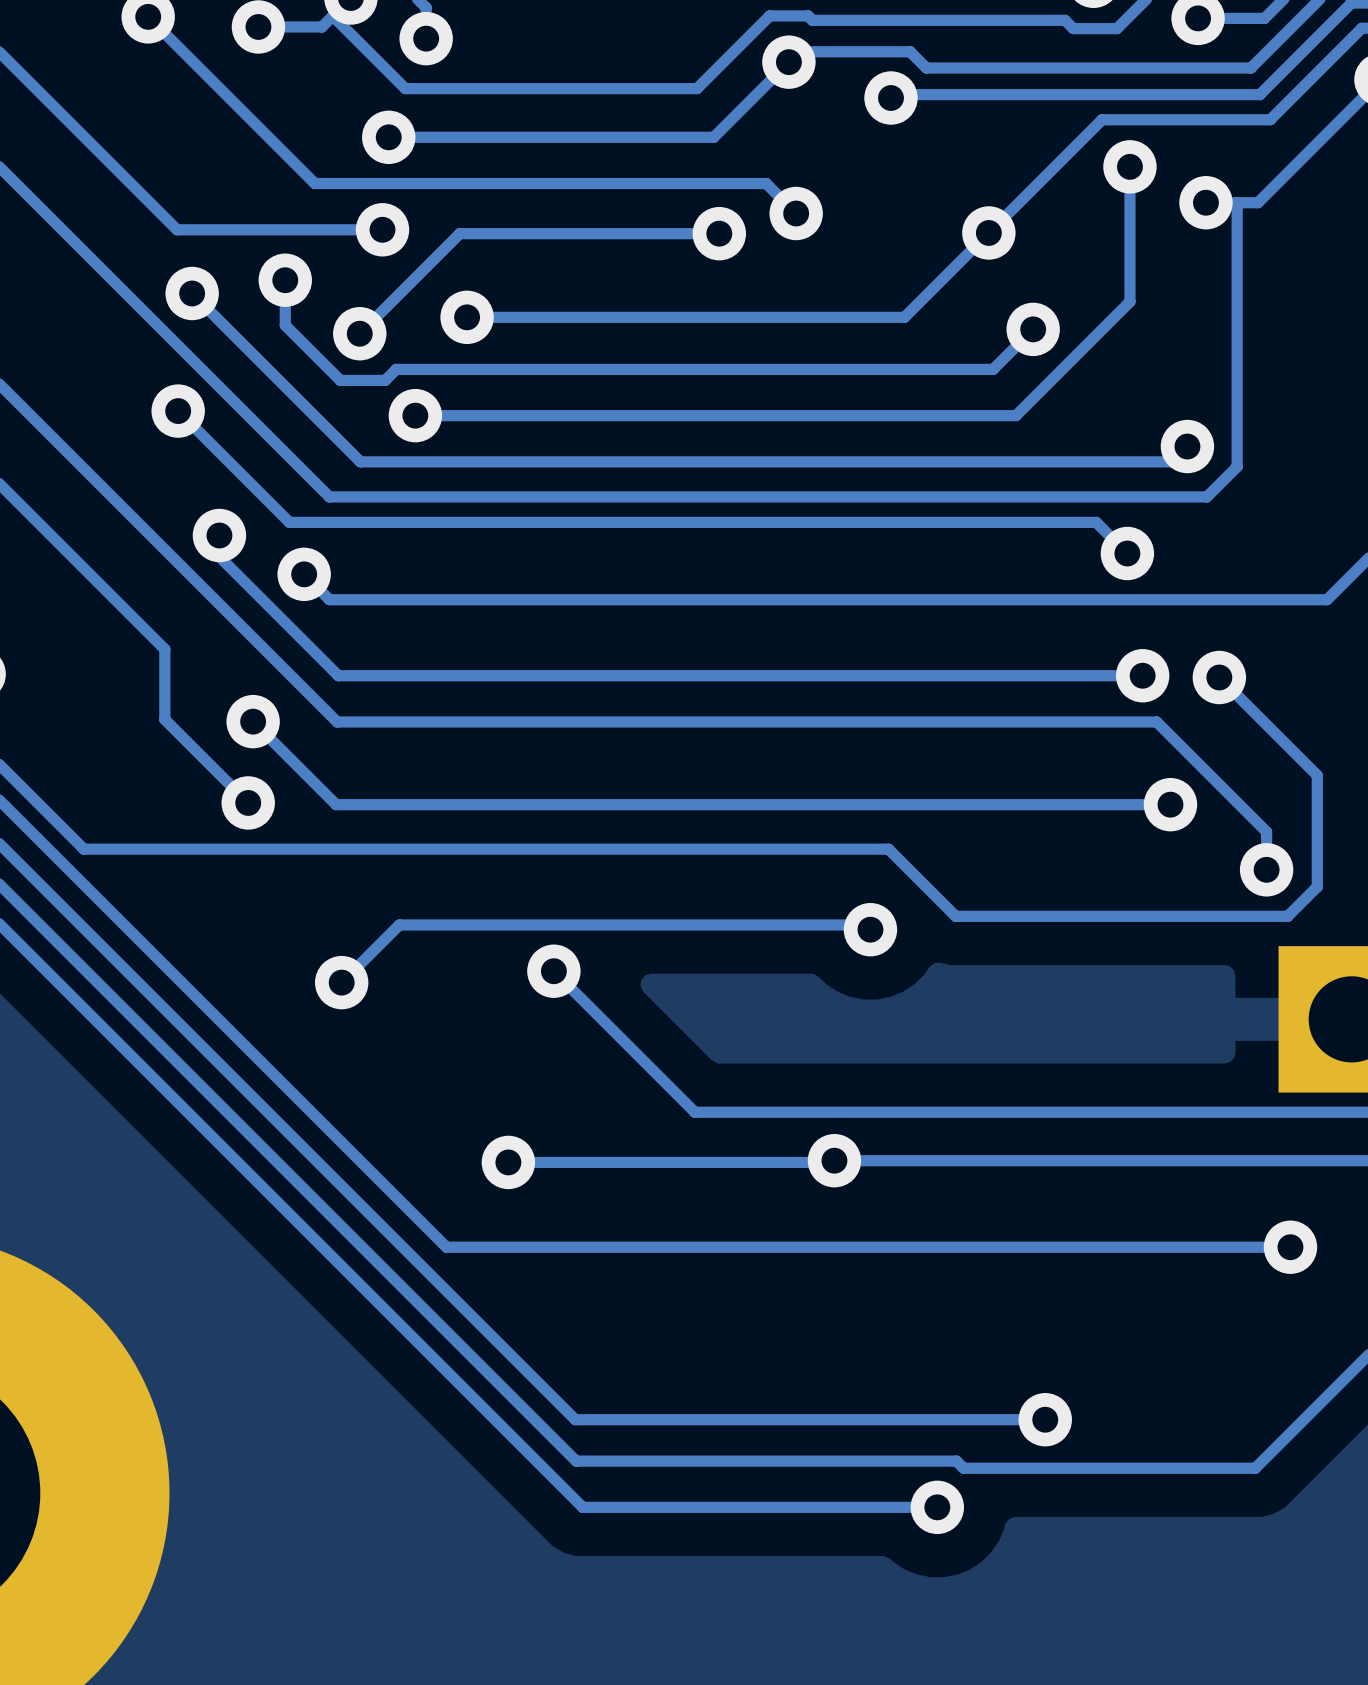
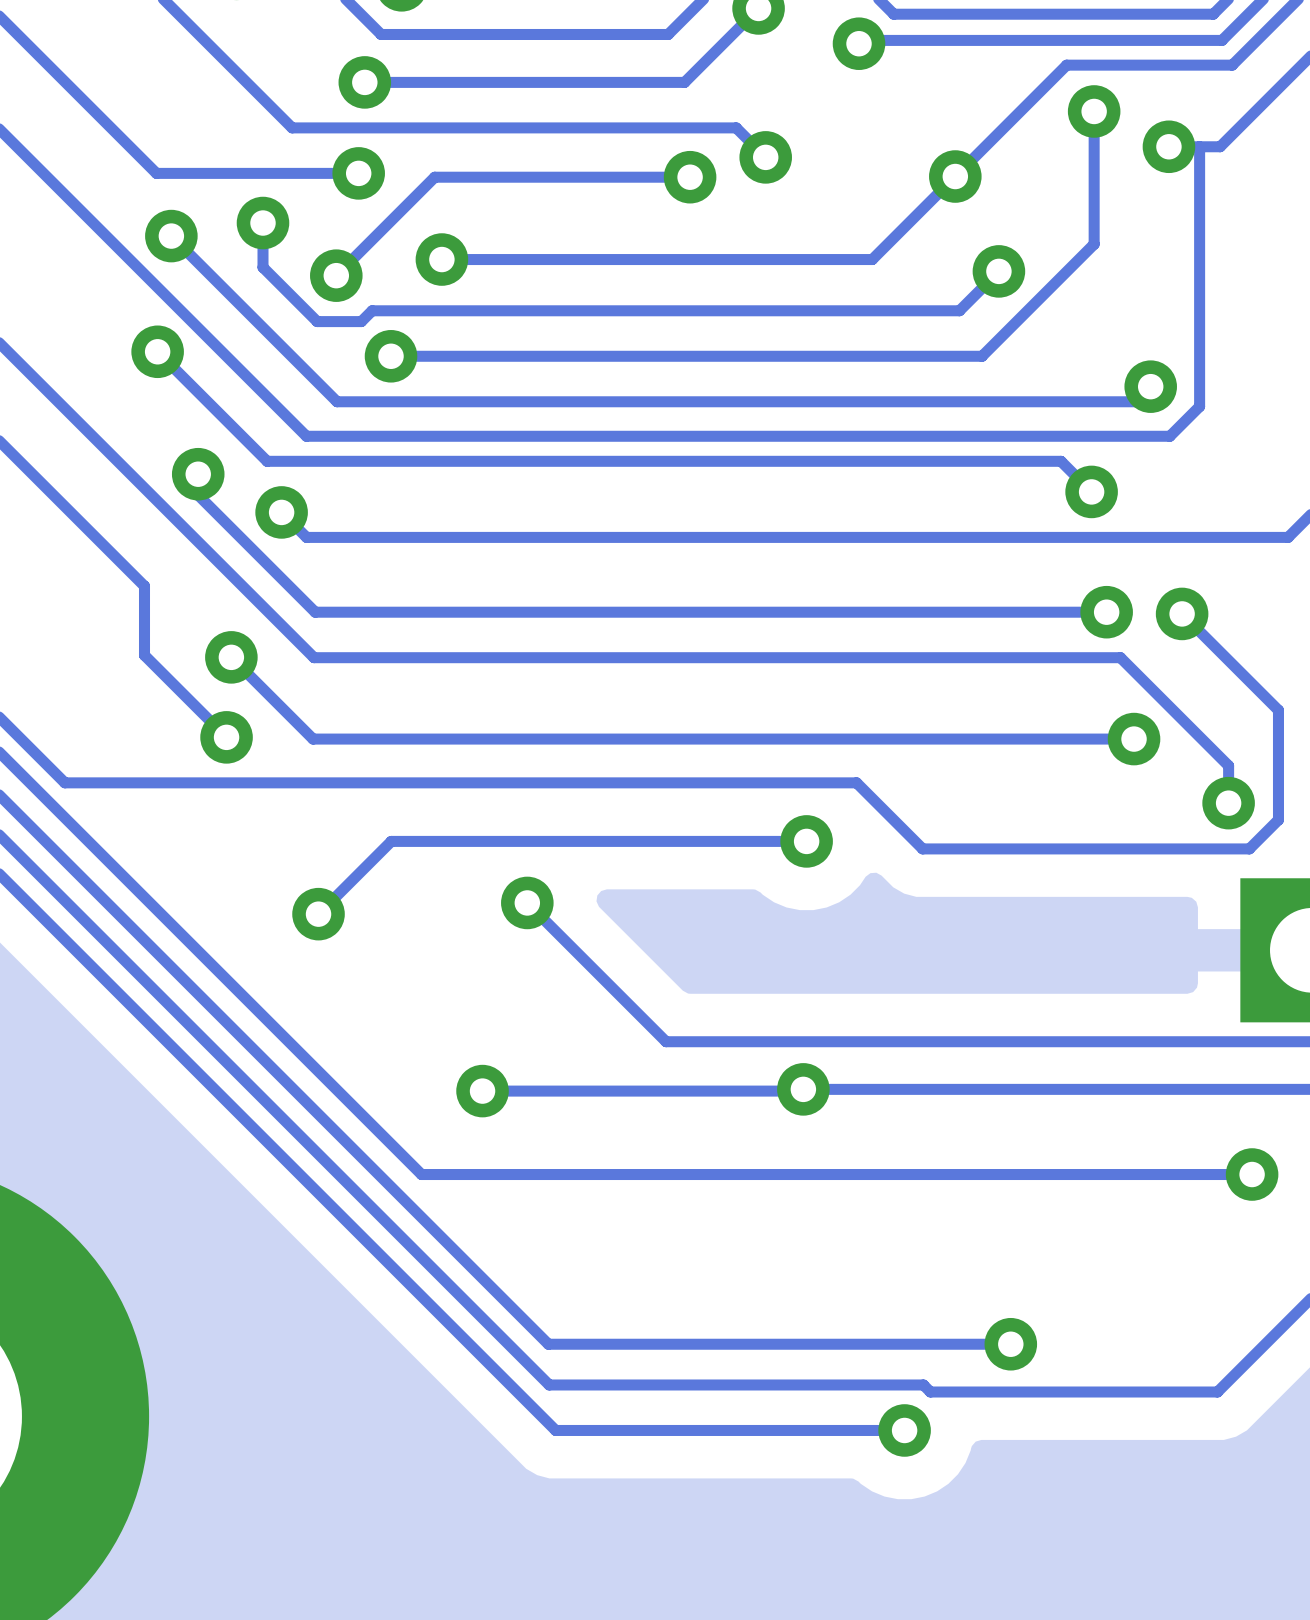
track: (399, 924) (865, 924) (870, 929) -> (375, 857) (391, 841) (806, 841)
via position: (870, 929) -> (806, 841)

